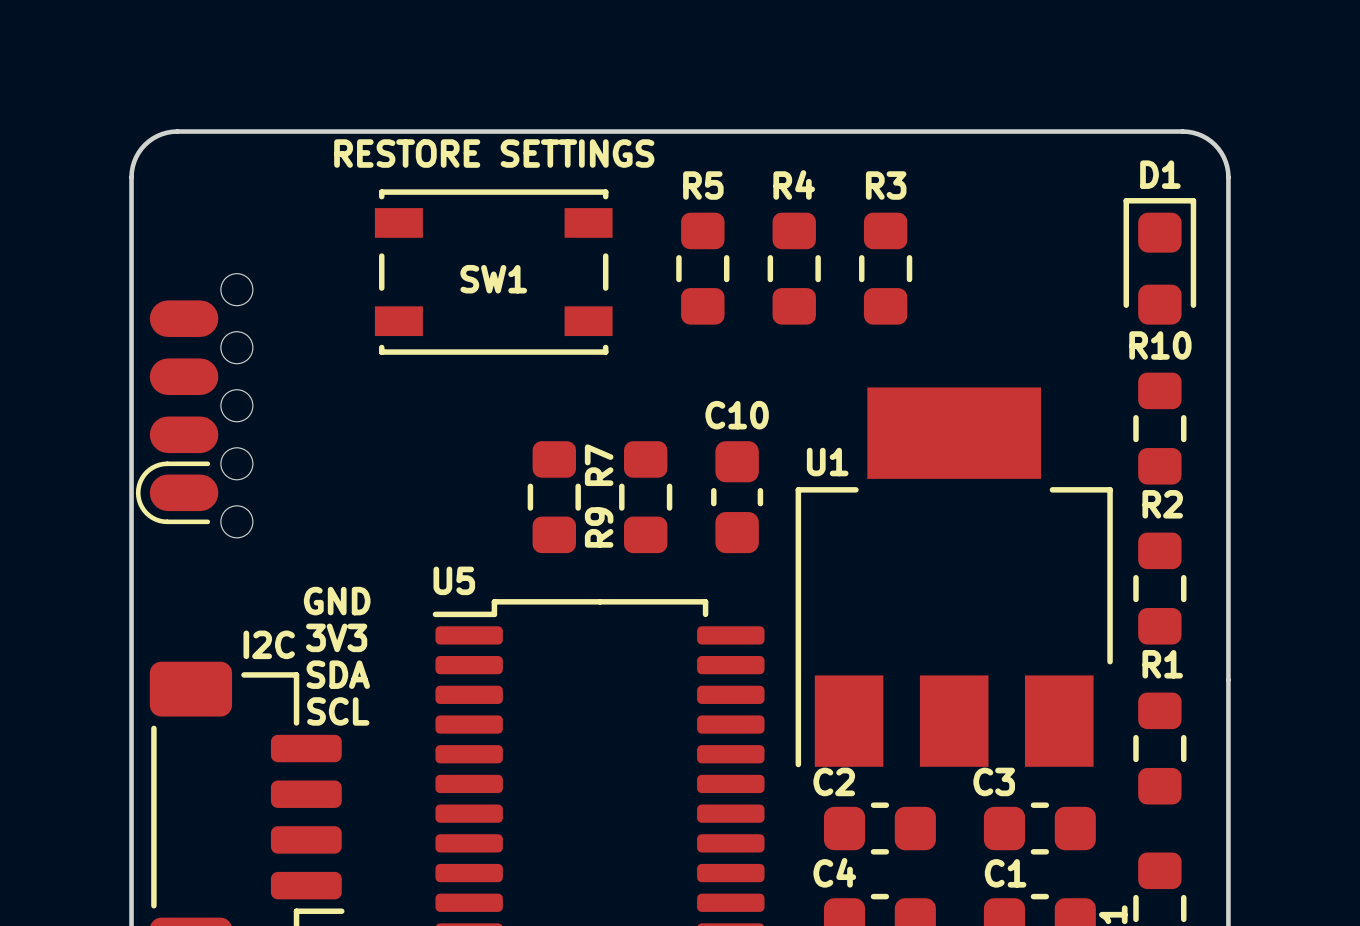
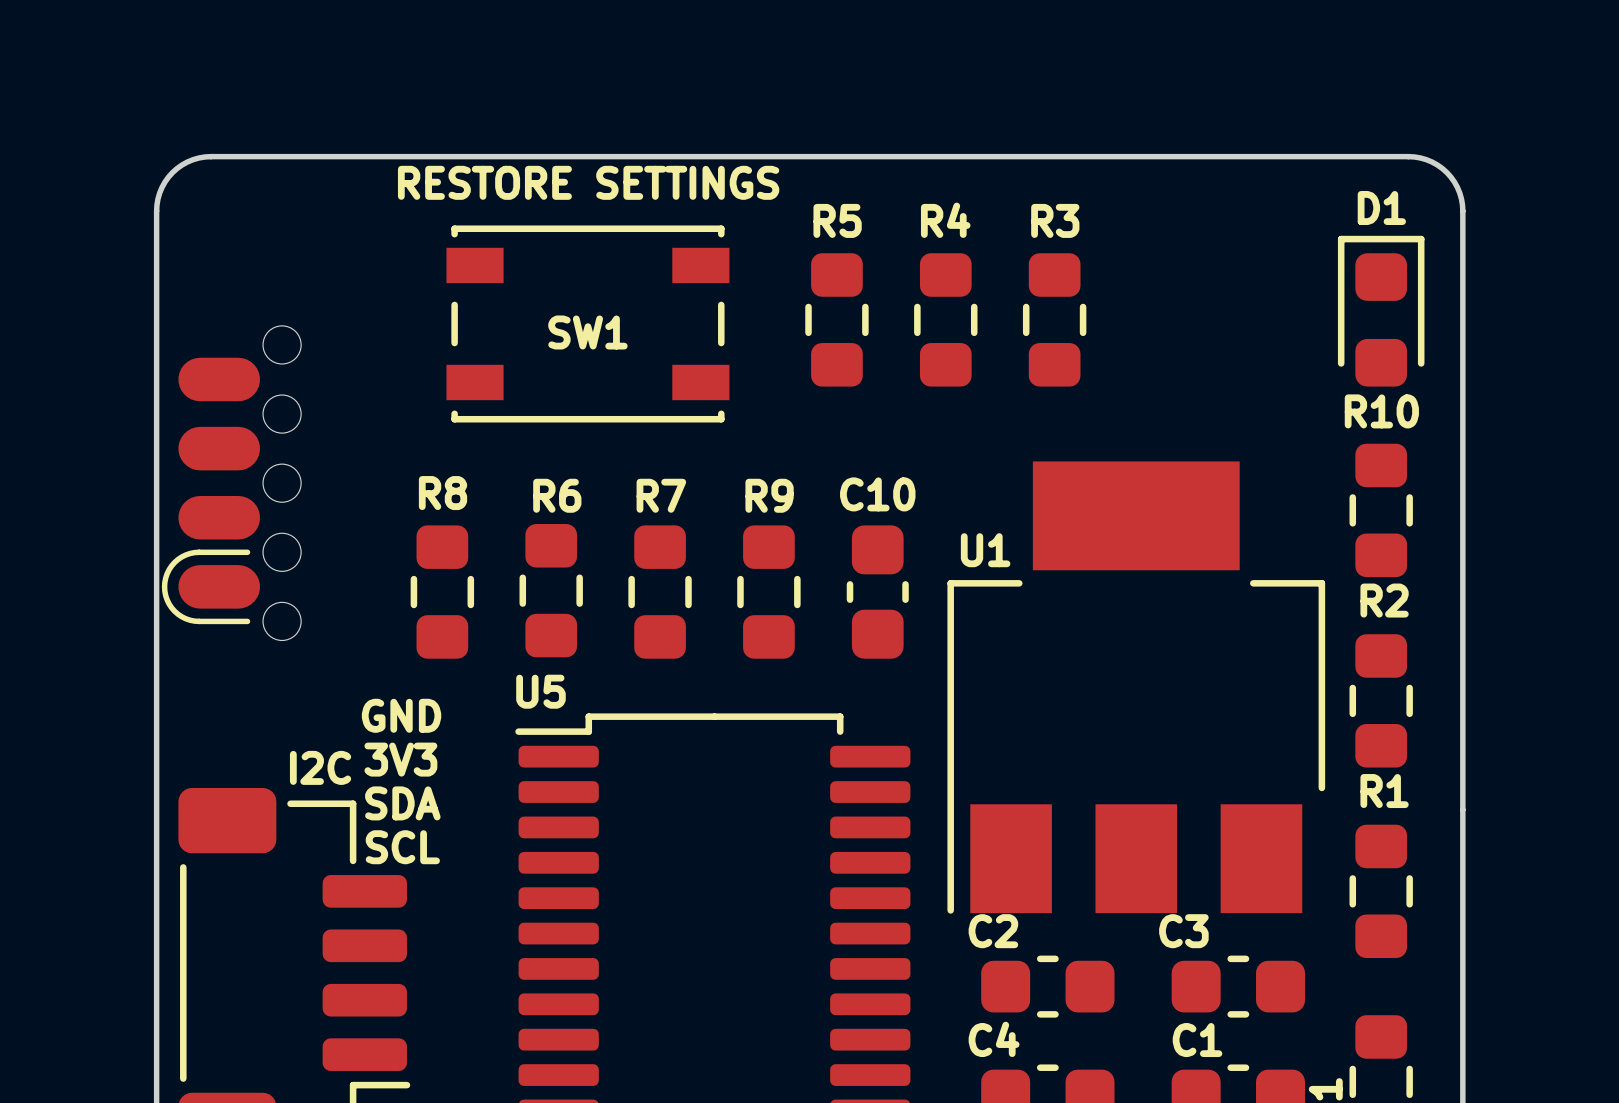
R7 name rotation: 0° (599, 465) -> 90° clockwise (661, 495)
R7 name position: R7 (599, 465) -> R7 (661, 495)
R6: none -> (551, 590)
R8: none -> (442, 592)
R9 name rotation: 0° (599, 527) -> 90° clockwise (769, 495)
R9 name position: R9 (599, 527) -> R9 (769, 495)

